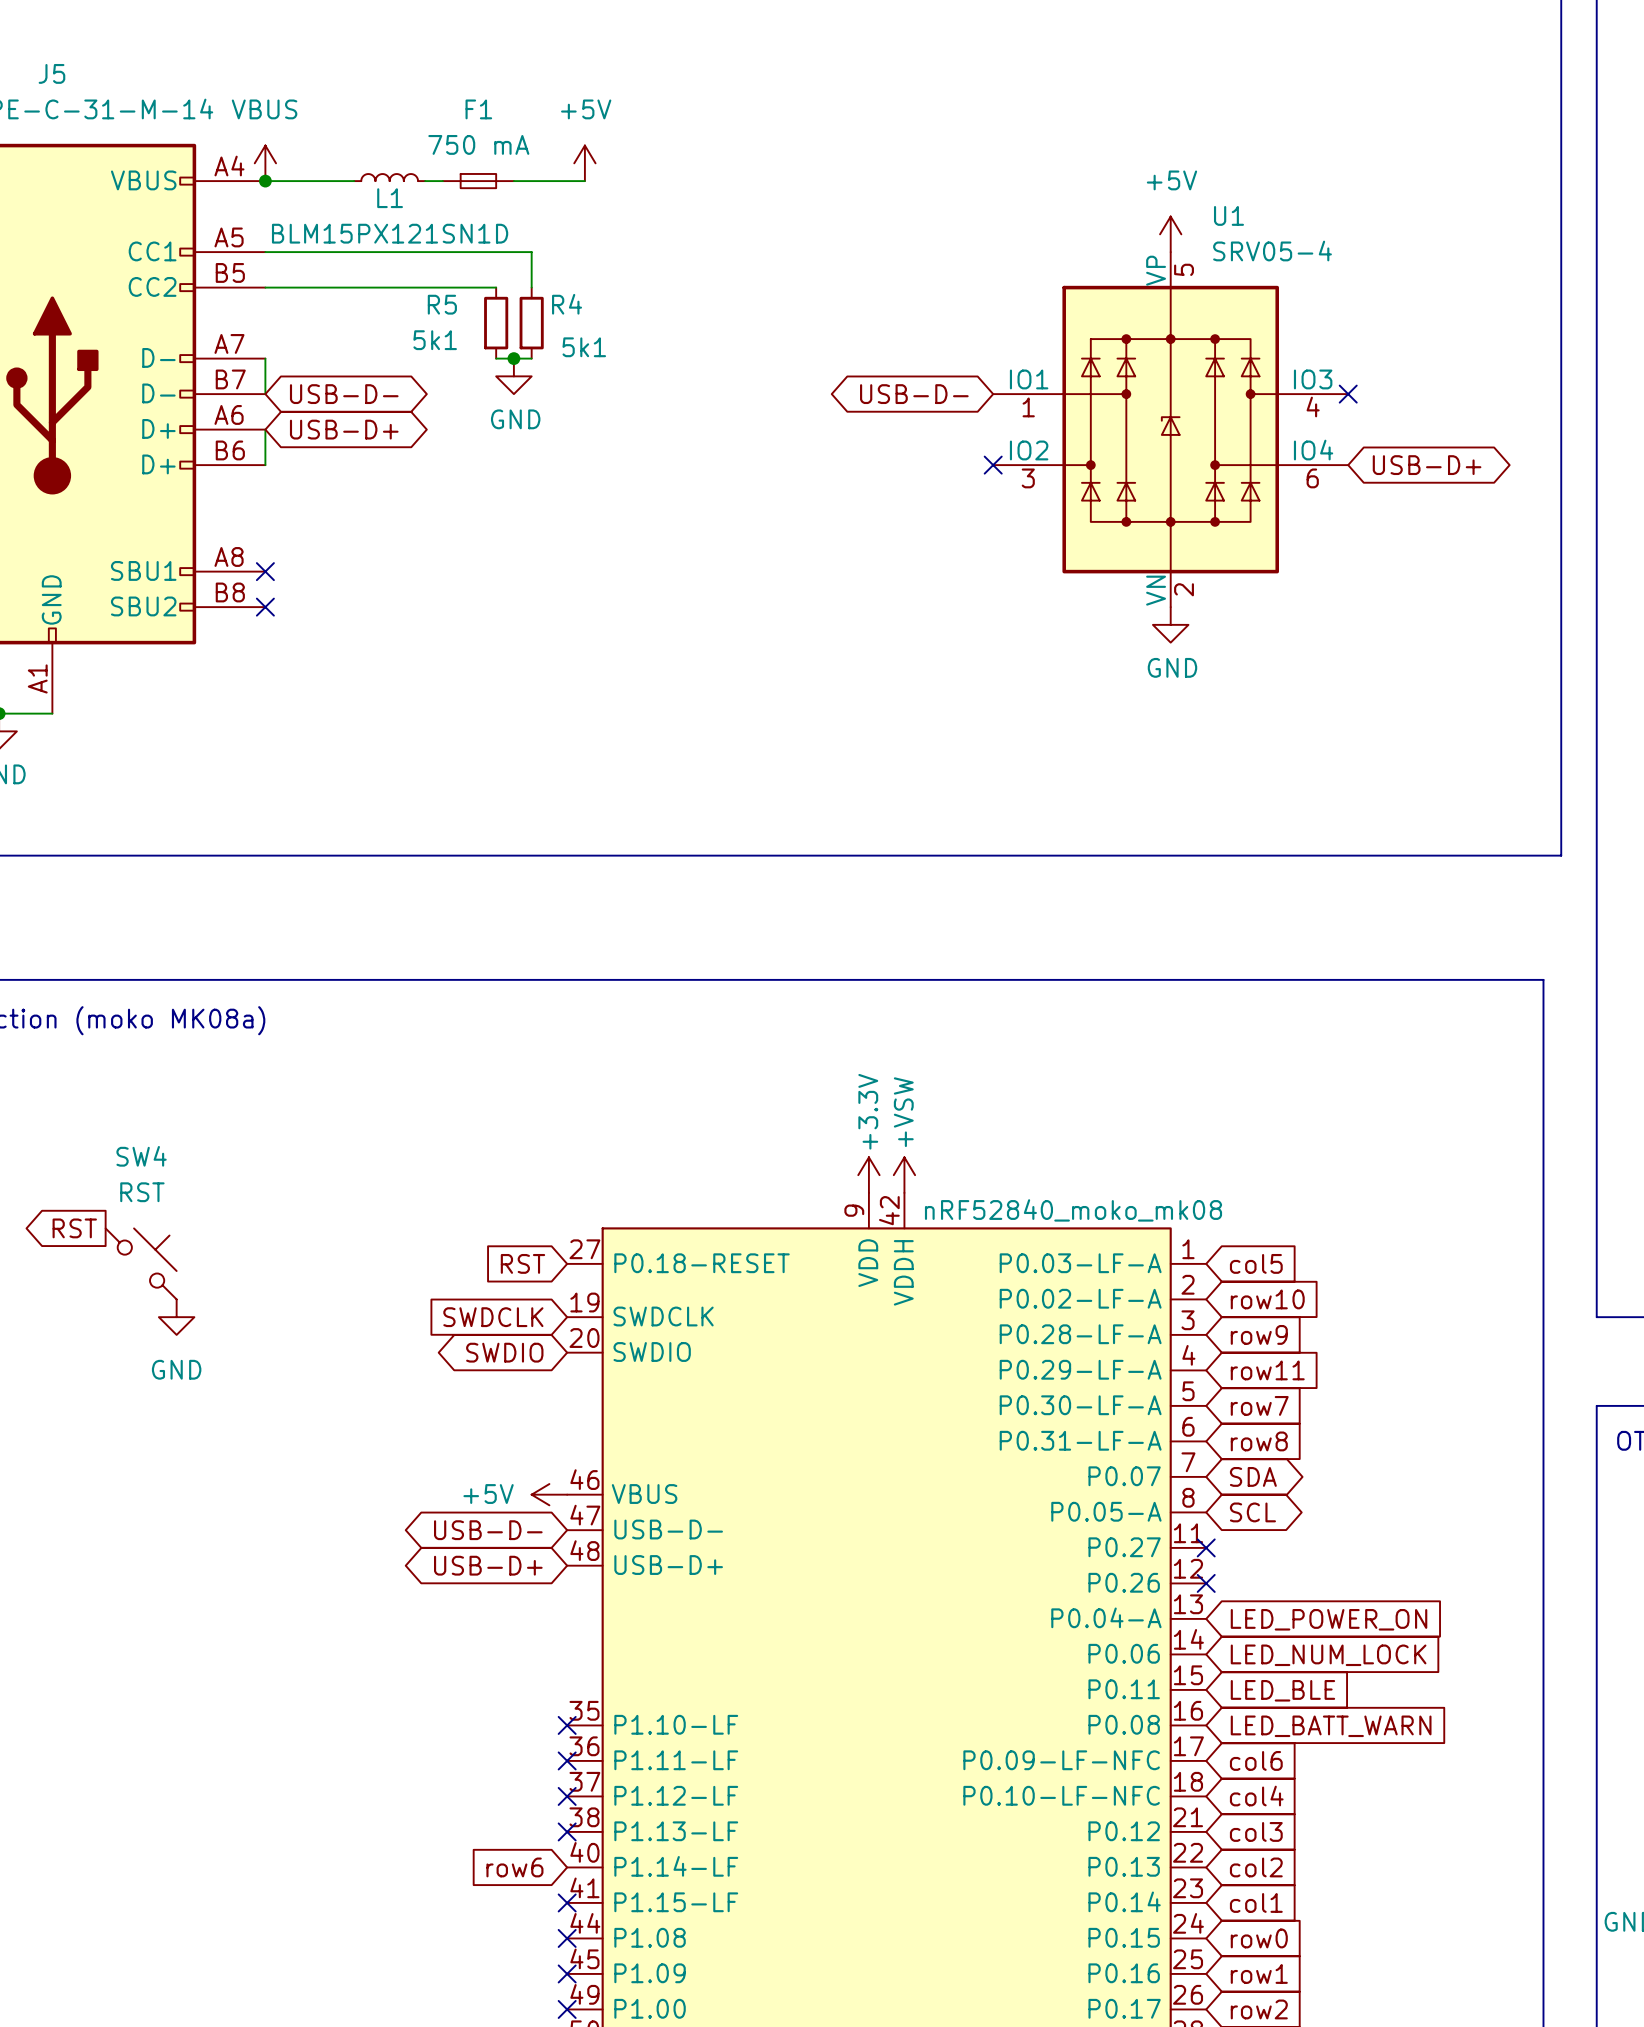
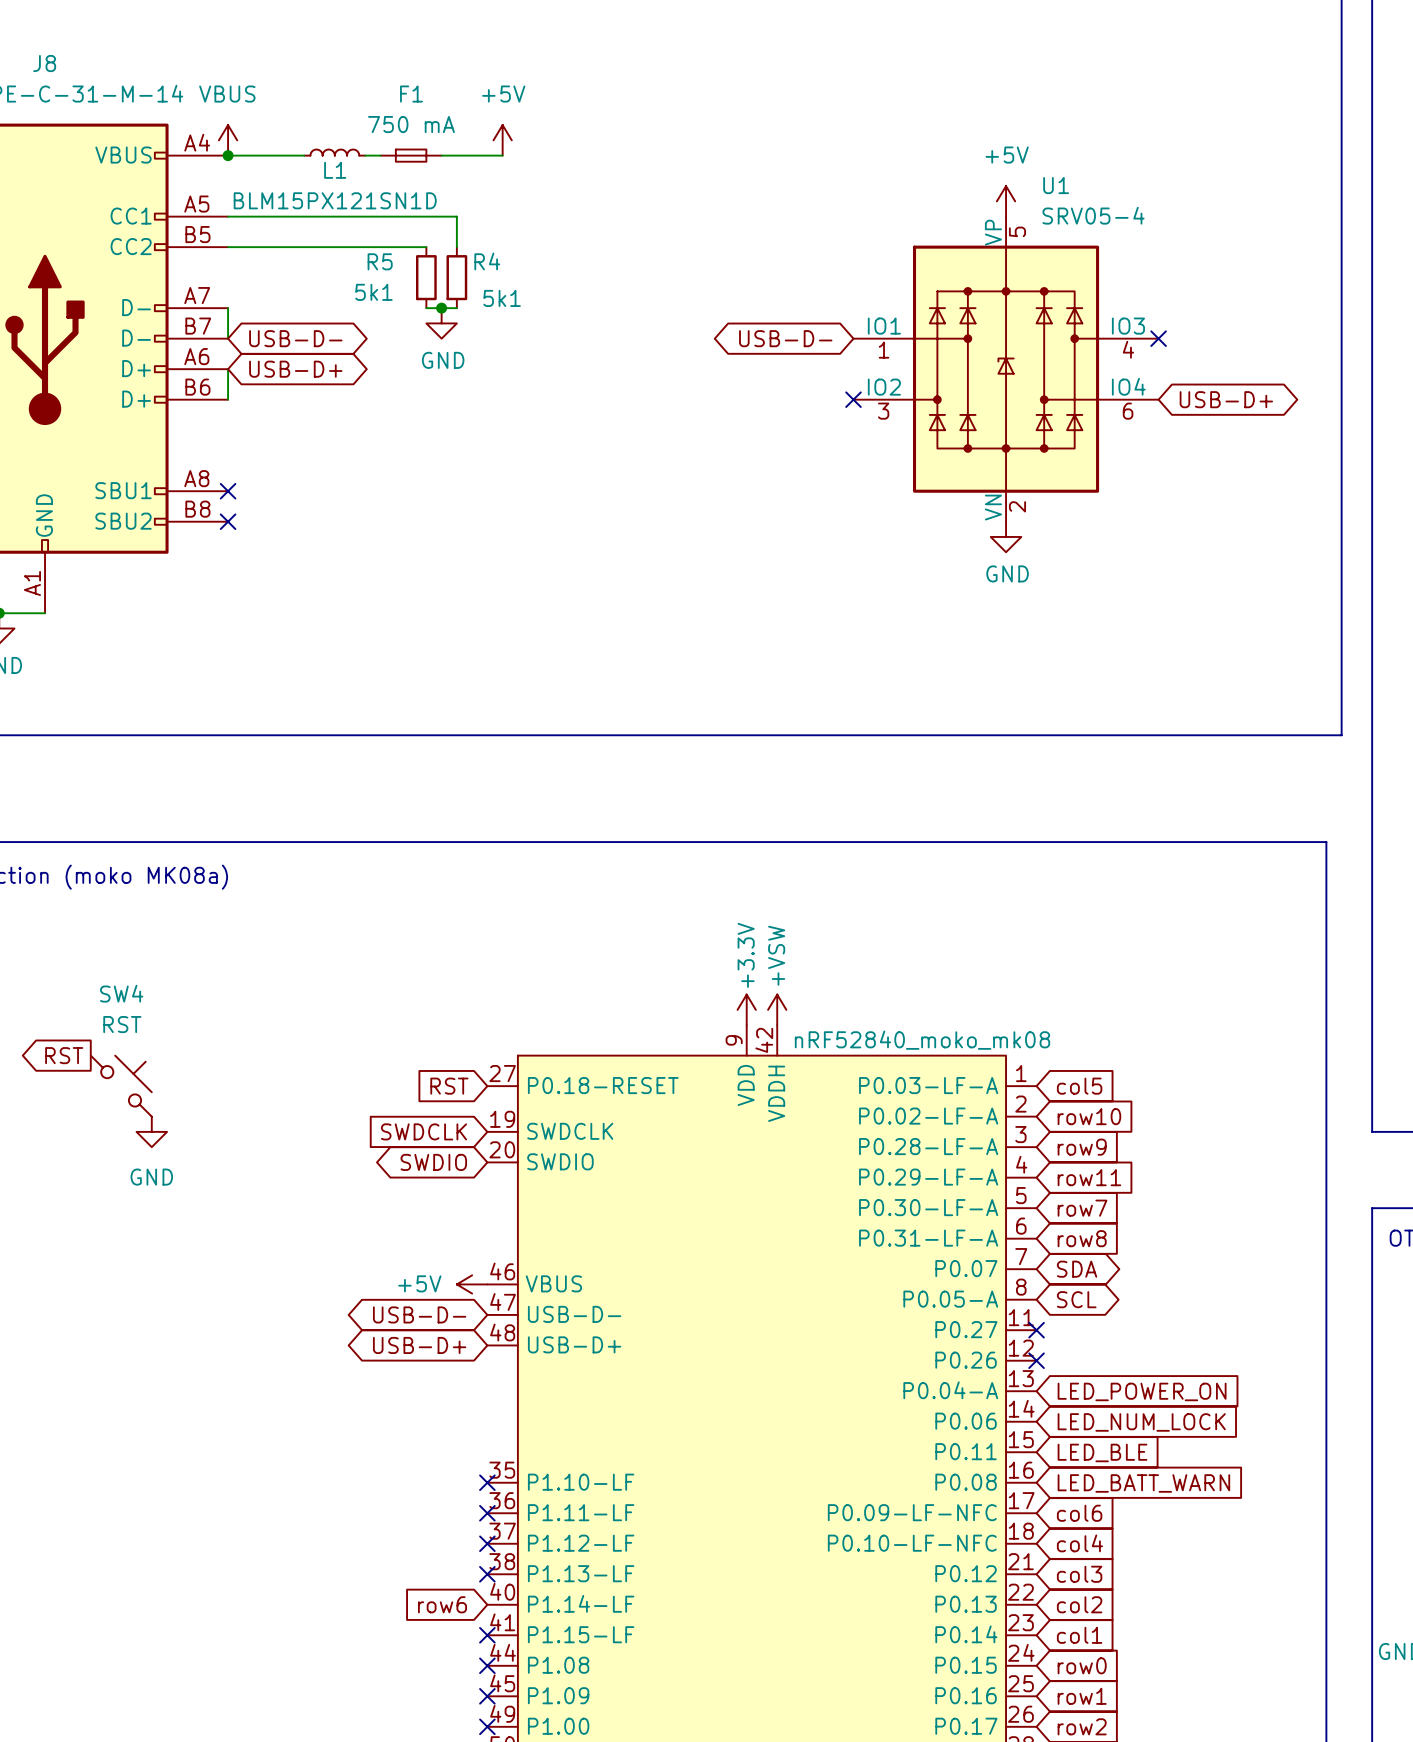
J5 name: J5 (51, 73) -> J8 (44, 63)

